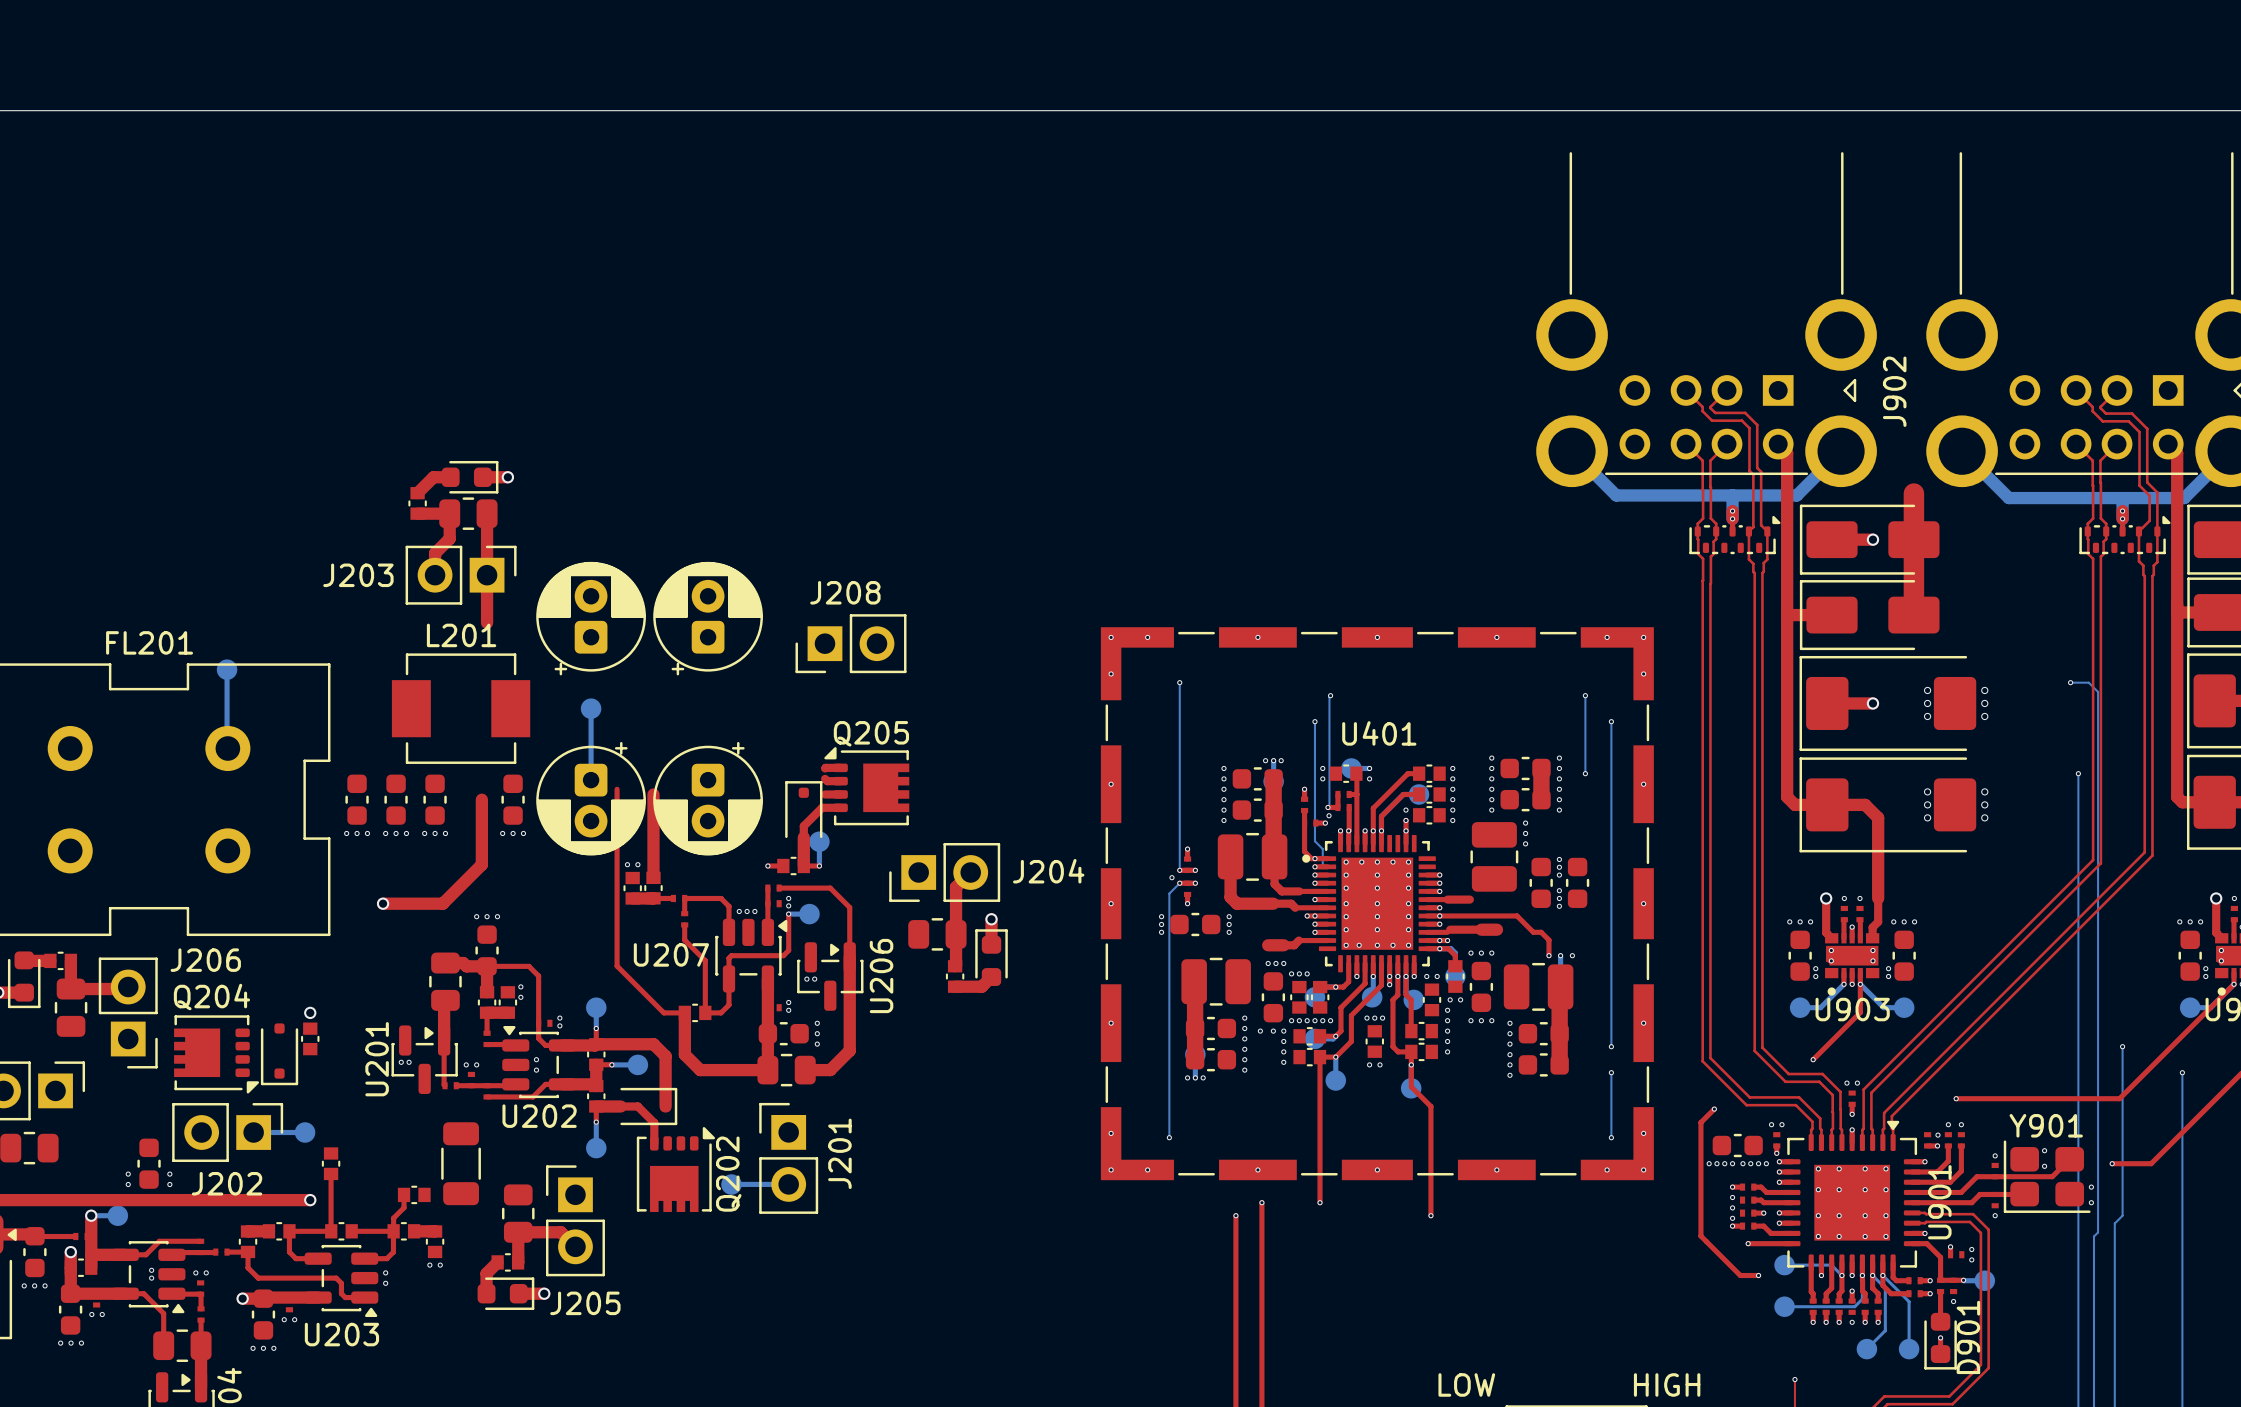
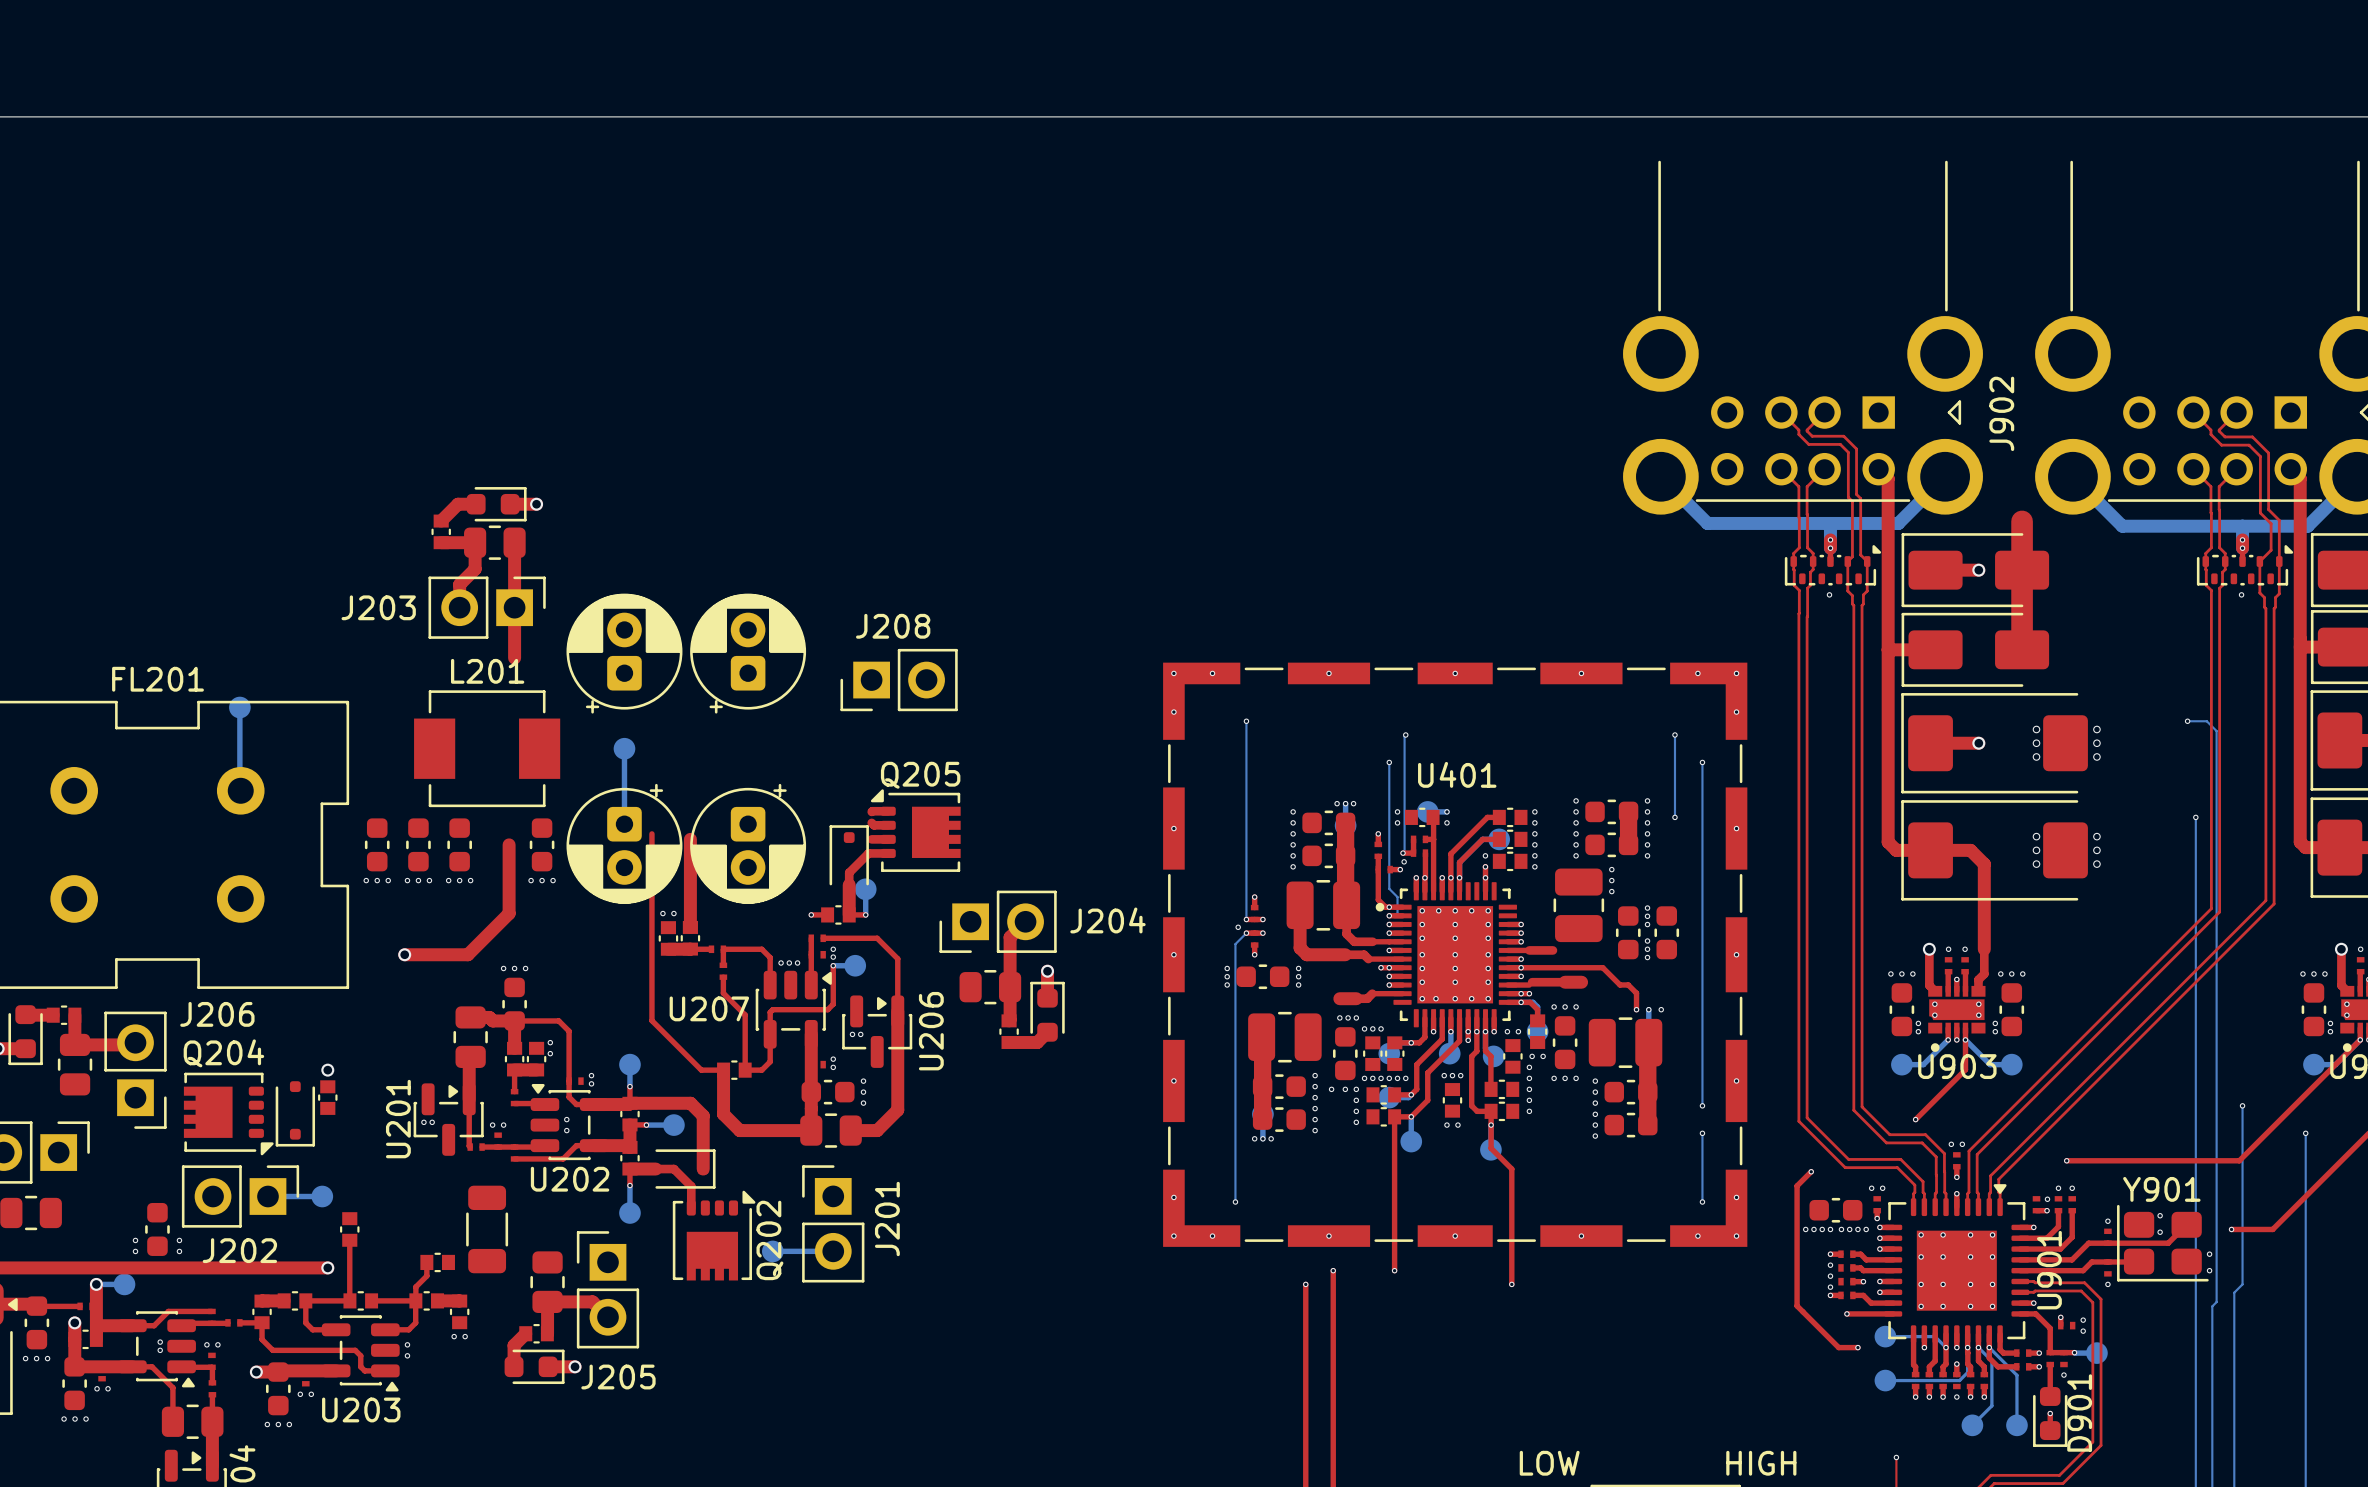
via: none -> (1829, 594)
via: none -> (2241, 594)

